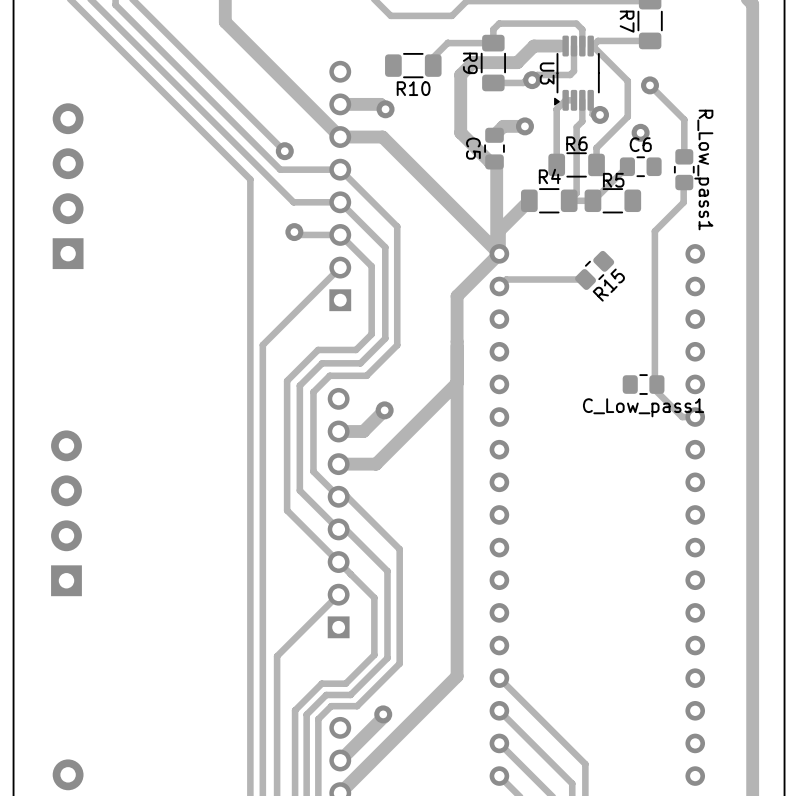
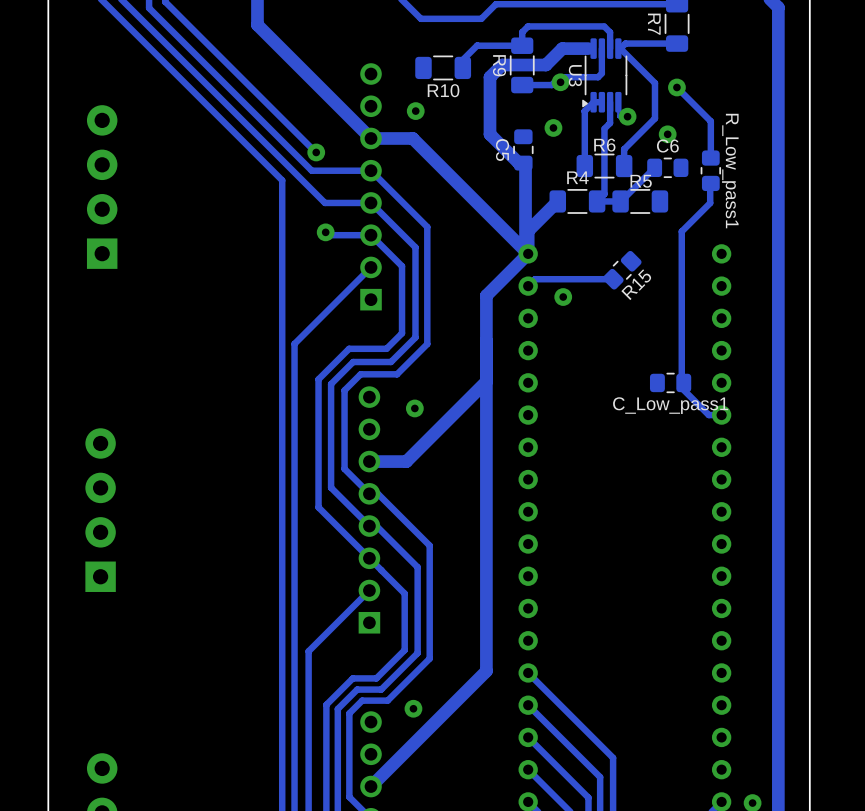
track: (340, 104) (380, 104) (385, 109) -> none
track: (524, 126) (503, 126) (494, 135) -> none
via: none -> (563, 297)
track: (384, 410) (363, 431) (338, 431) -> none
track: (383, 714) (383, 717) (340, 760) -> none

